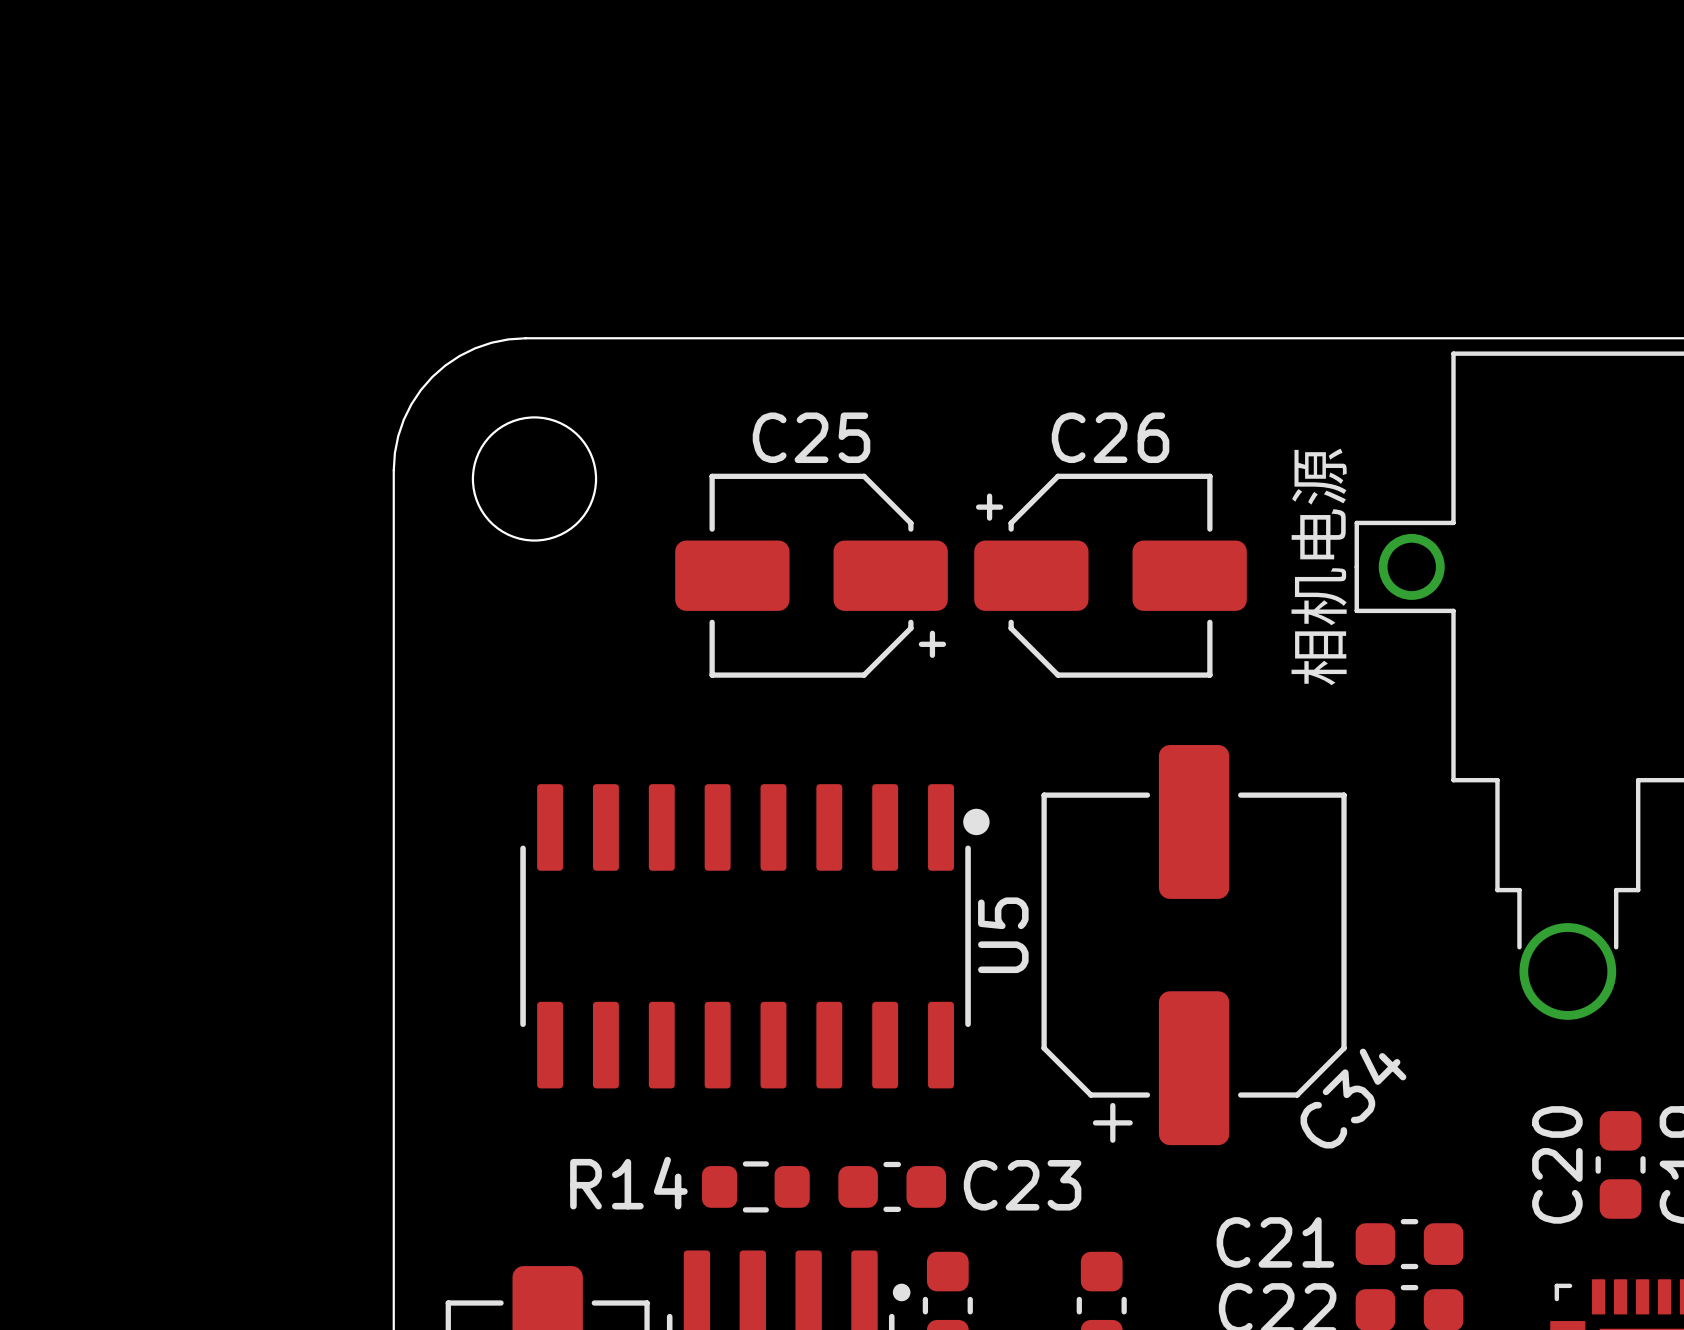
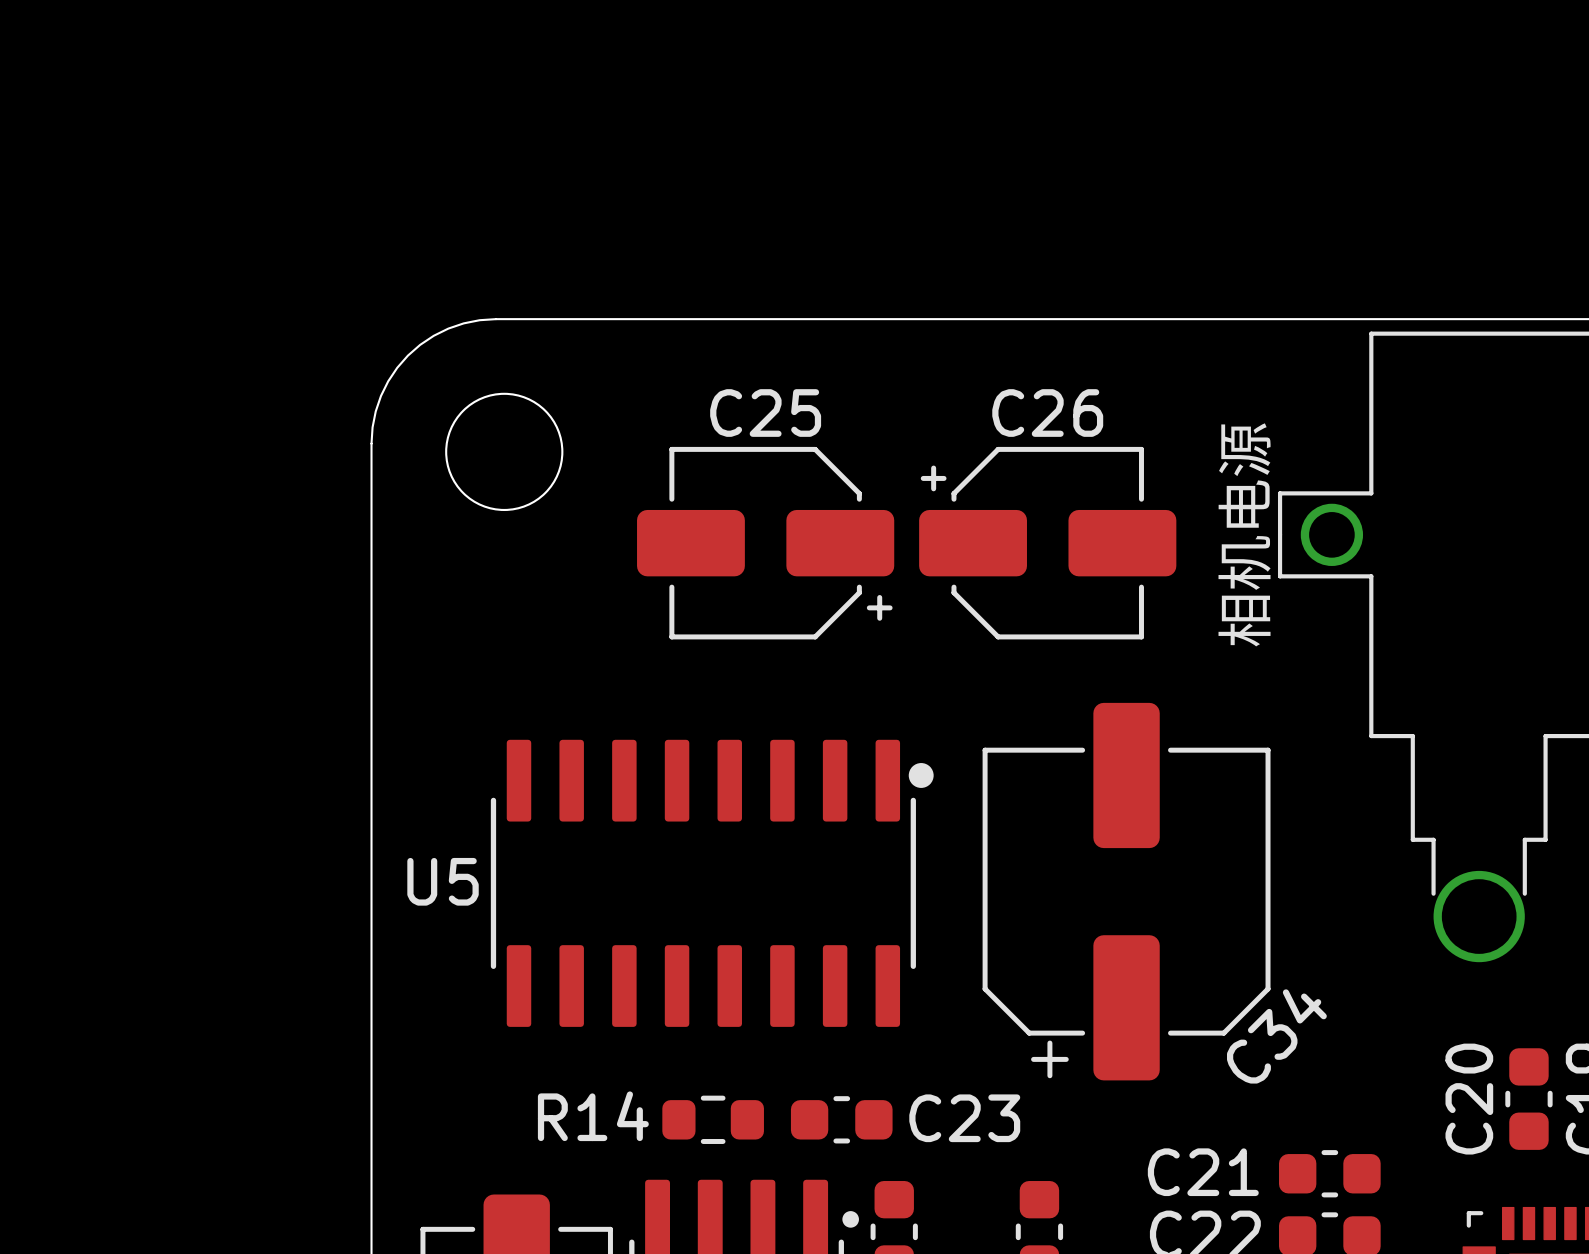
U5 name rotation: 0° (1003, 935) -> 90° clockwise (443, 881)
U5 name position: U5 (1003, 935) -> U5 (443, 881)

